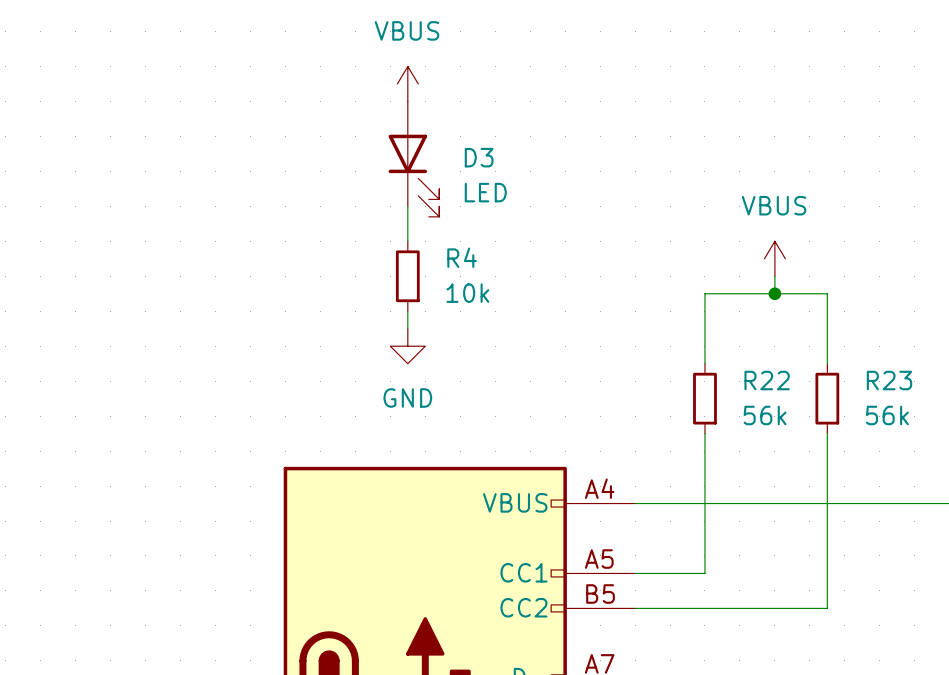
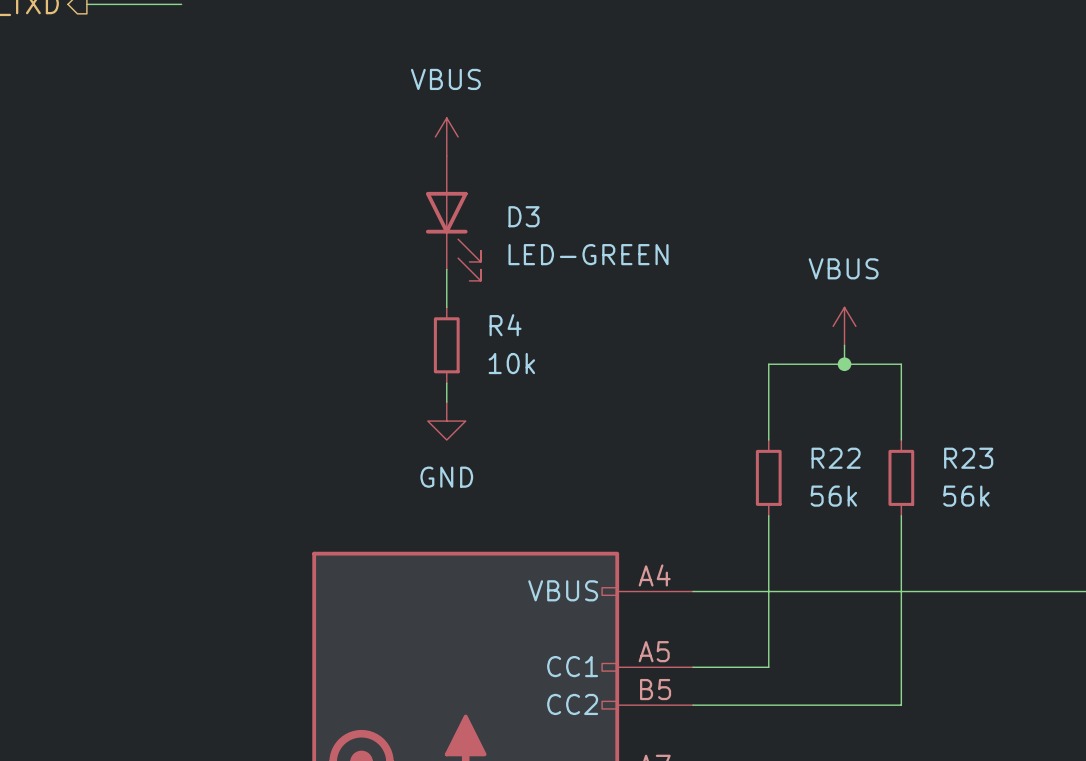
D3 value: LED (485, 192) -> LED-GREEN (588, 254)

